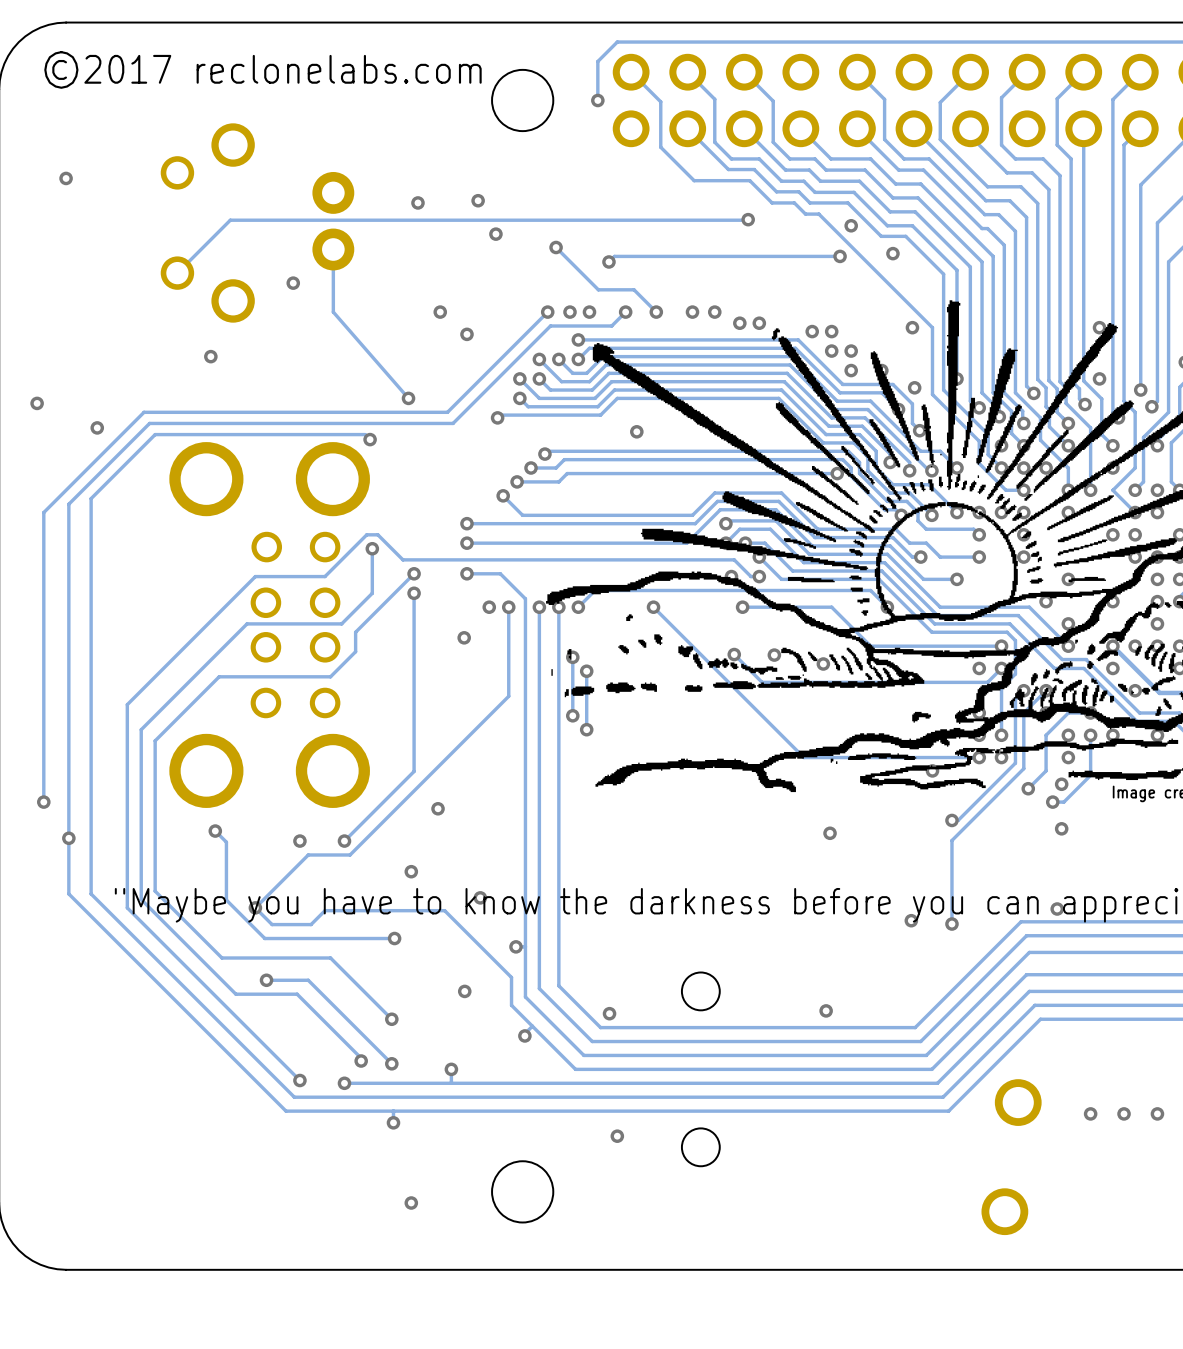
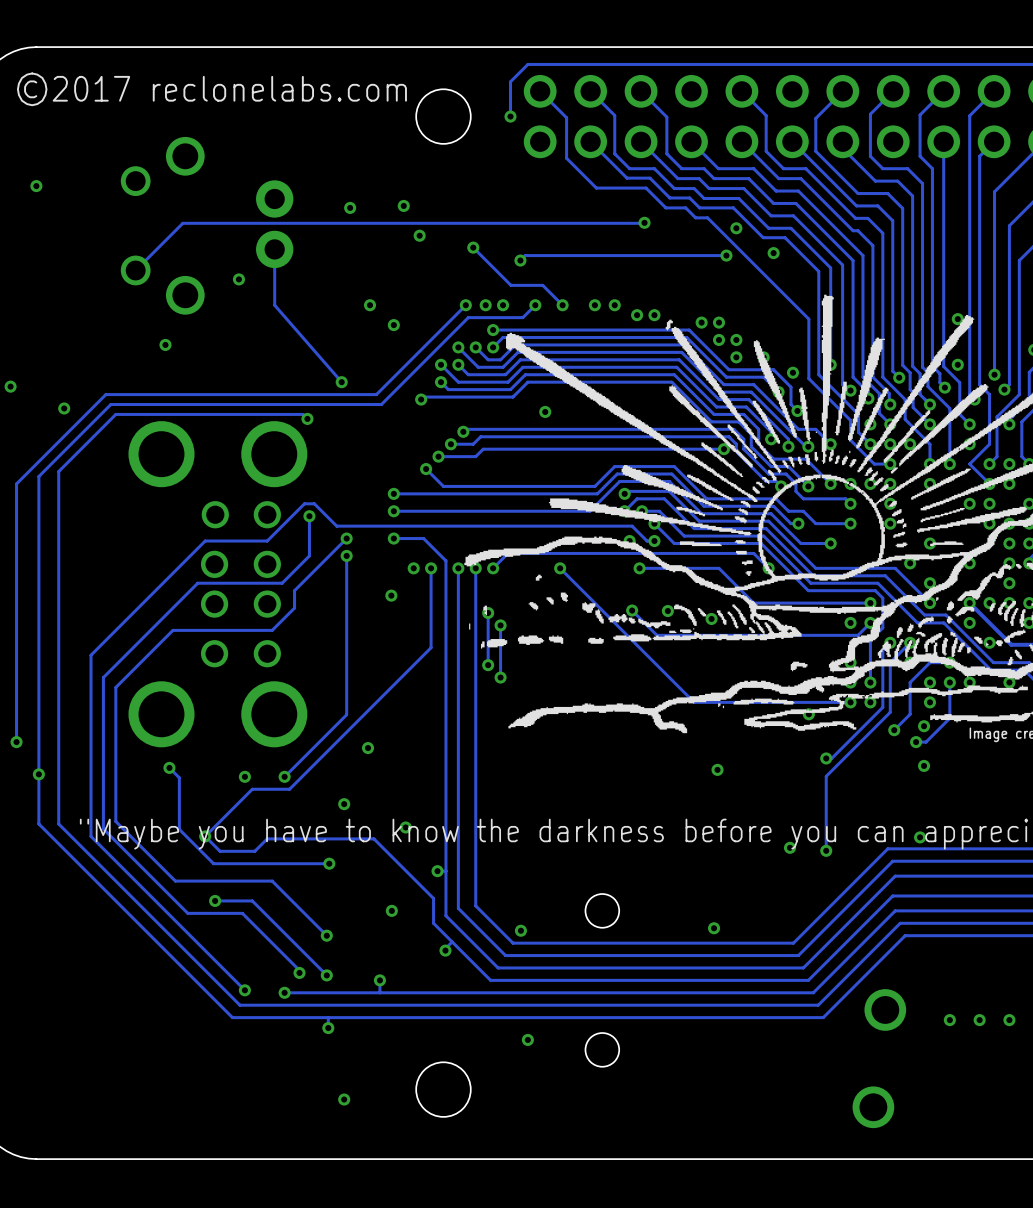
via: (912, 327) -> none

